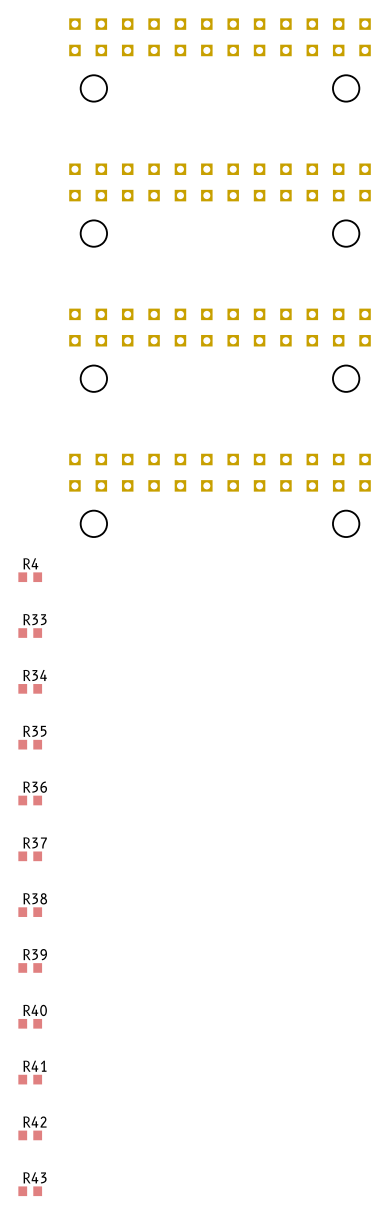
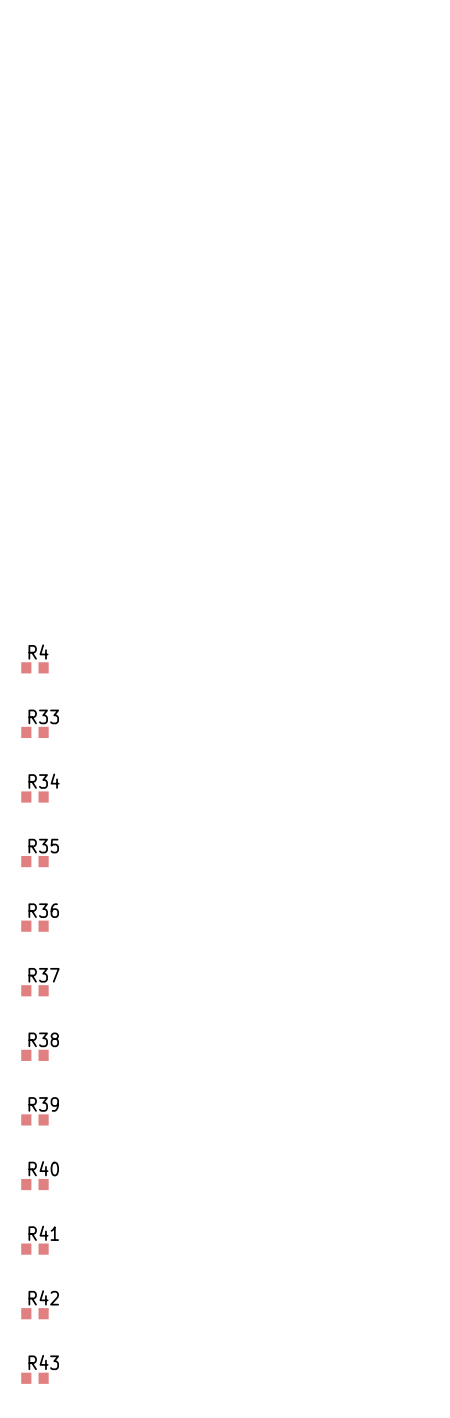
part: (220, 59) -> none
part: (220, 205) -> none
part: (220, 350) -> none
part: (220, 495) -> none

